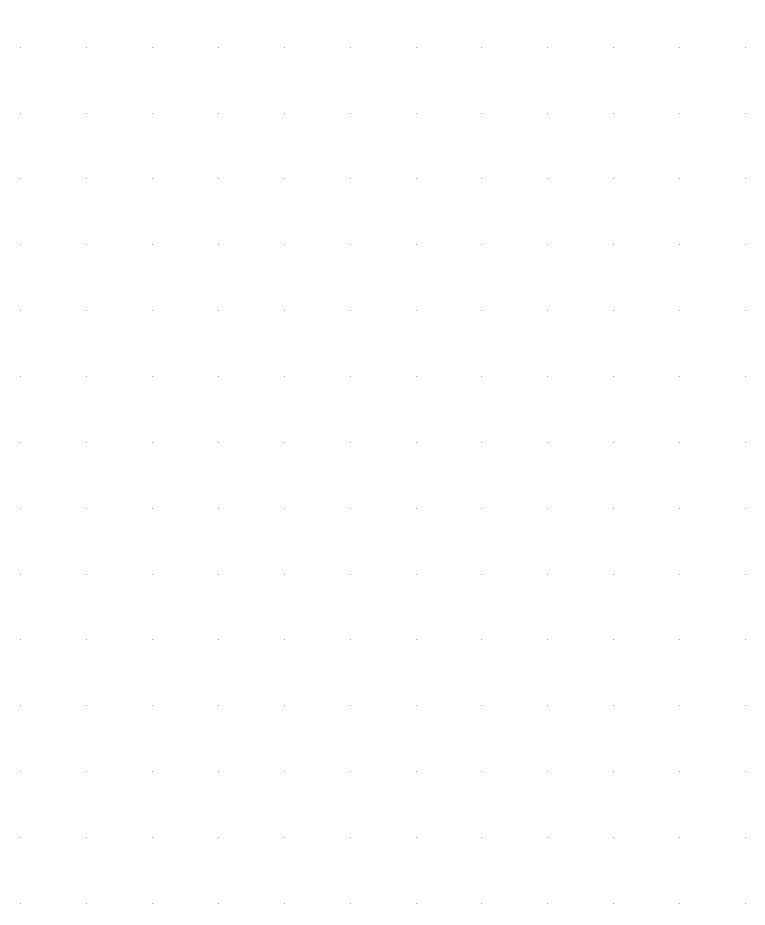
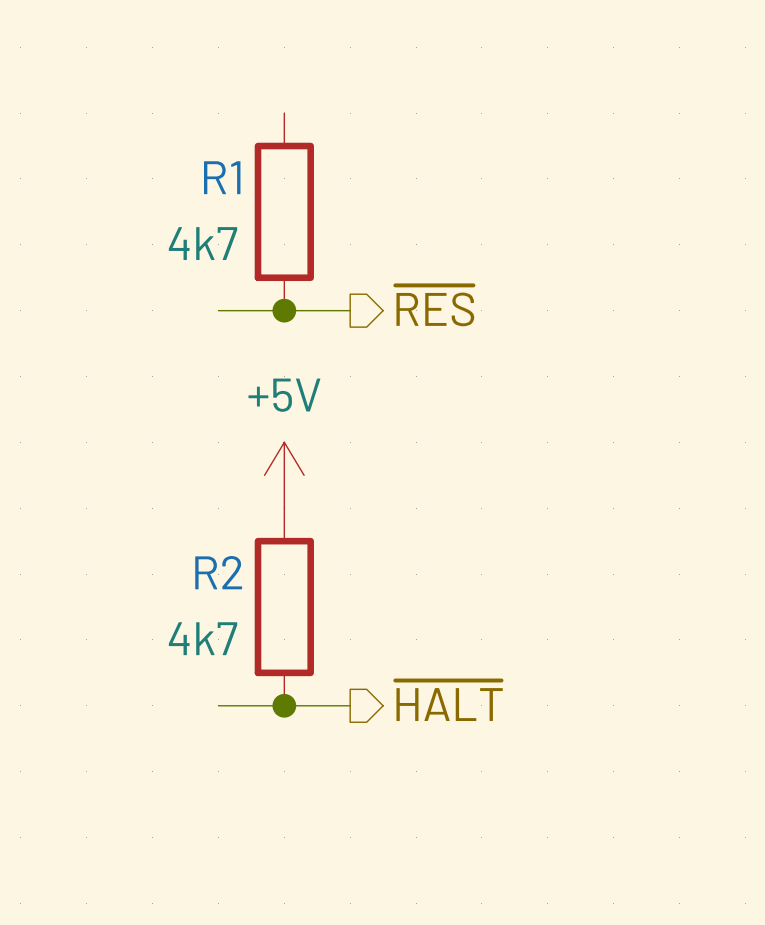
R1: none -> 4k7 (284, 211)
hierarchical label: none -> ~{RES} (434, 305)
wire: none -> (218, 310) (350, 310)
junction: none -> (284, 310)
power symbol: none -> +5V (284, 475)
R2: none -> 4k7 (284, 607)
hierarchical label: none -> ~{HALT} (449, 700)
wire: none -> (218, 705) (350, 705)
junction: none -> (284, 705)

